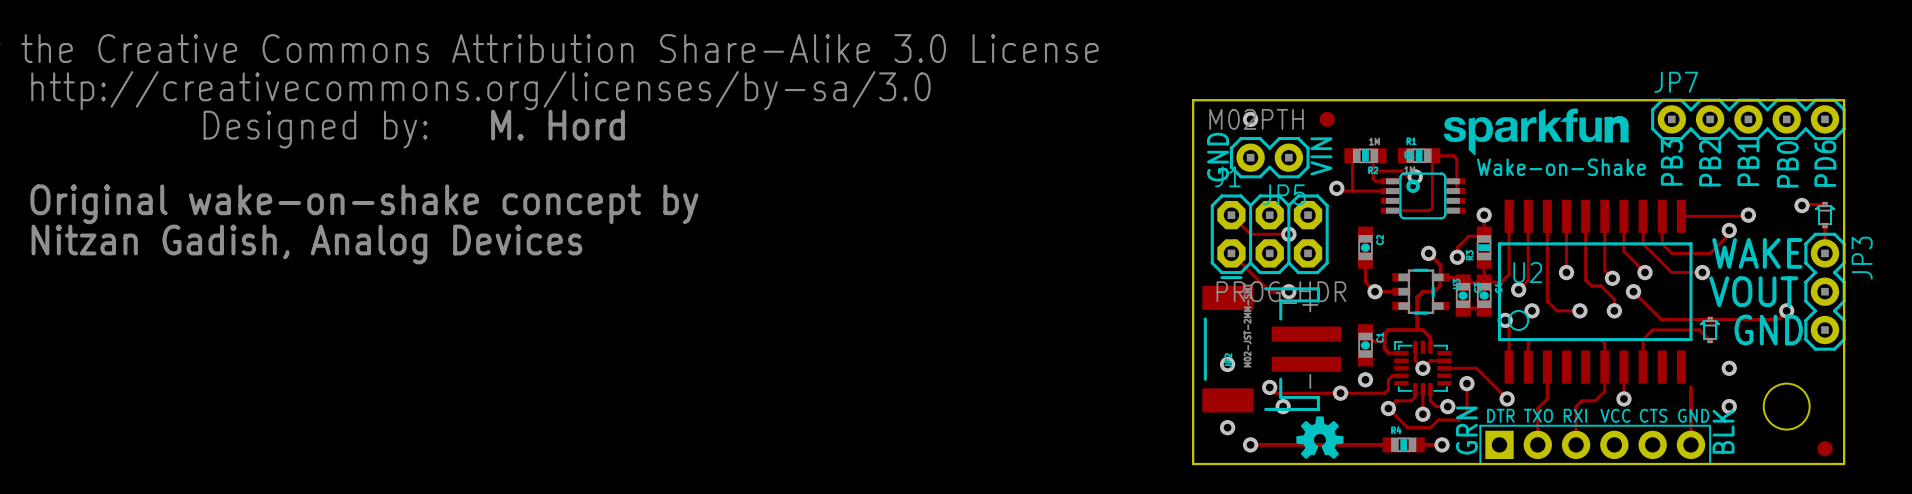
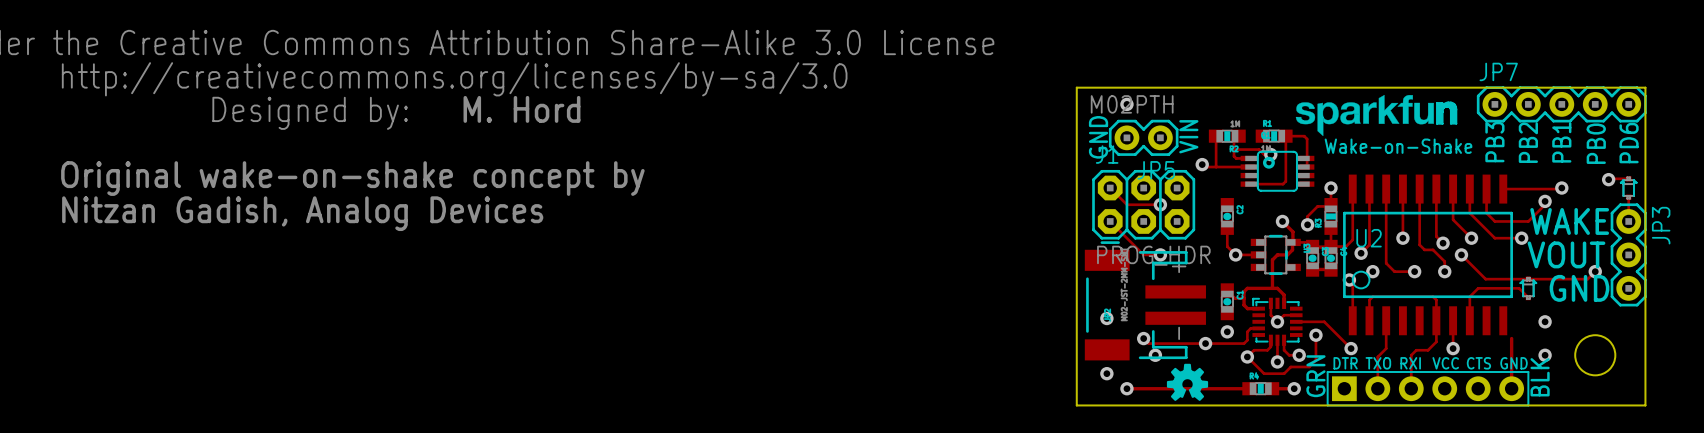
part: (1327, 119) -> none
part: (1824, 448) -> none

